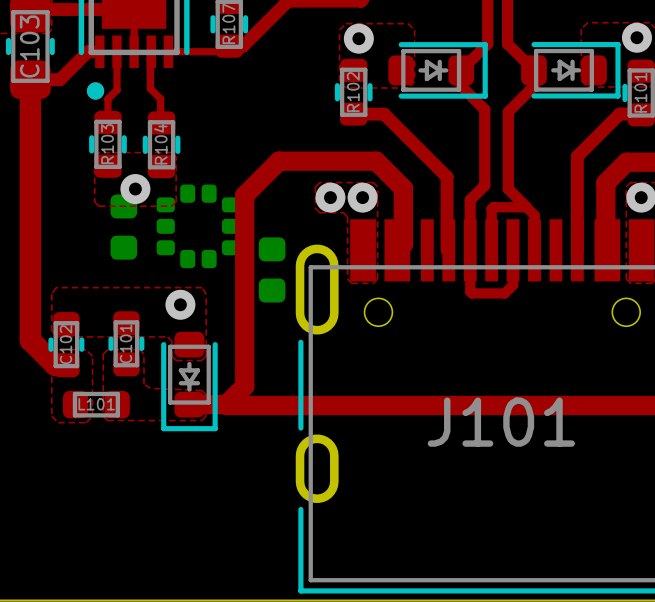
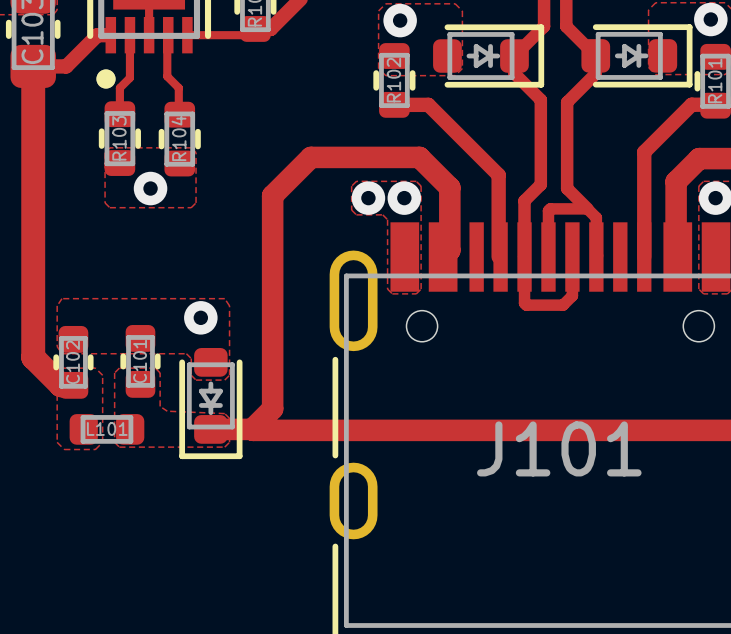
part: (198, 226) -> none
part: (123, 227) -> none
part: (272, 269) -> none

